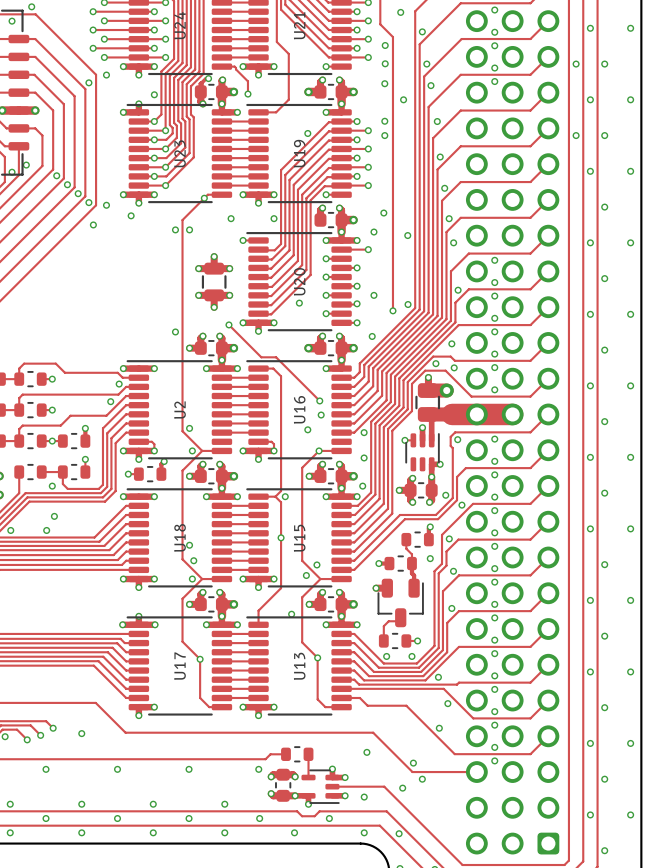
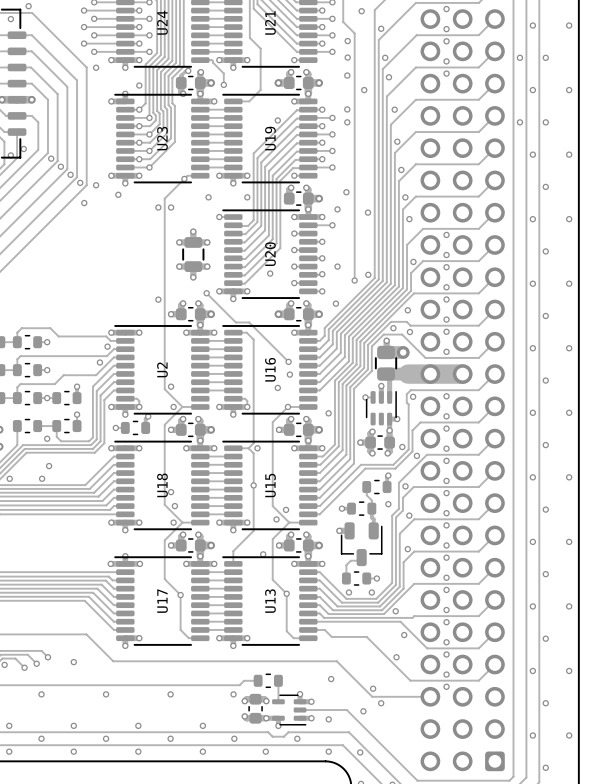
via: (88, 82) -> none
via: (364, 432) -> none
via: (362, 486) -> none

